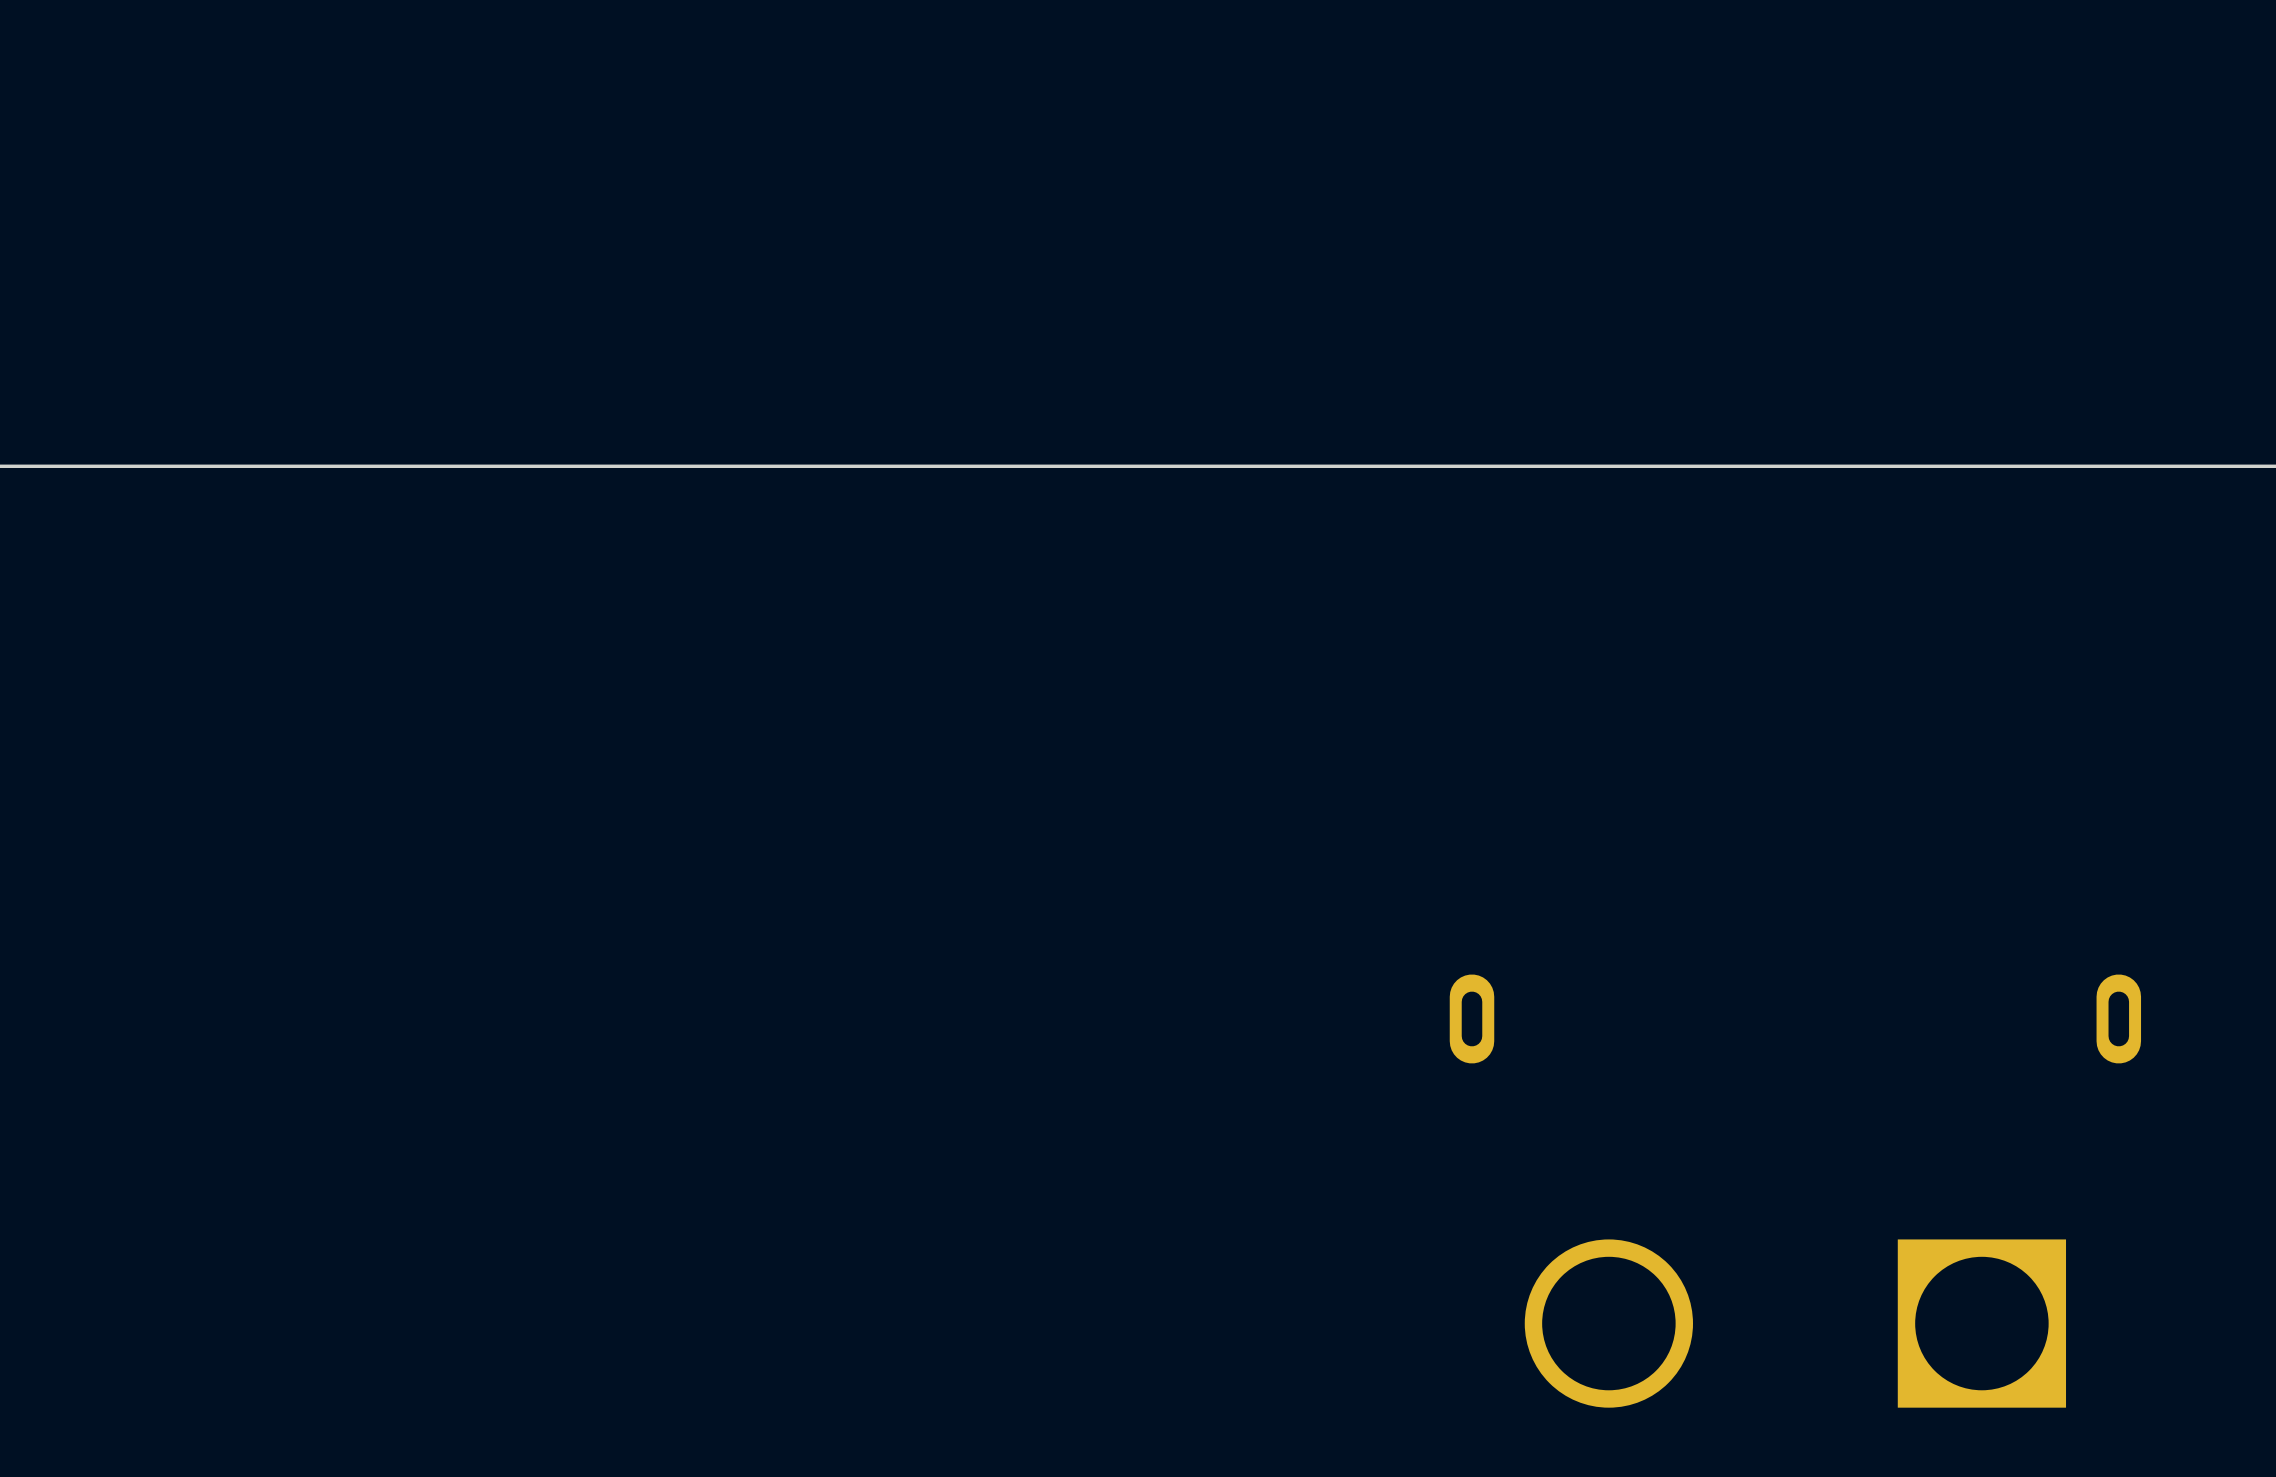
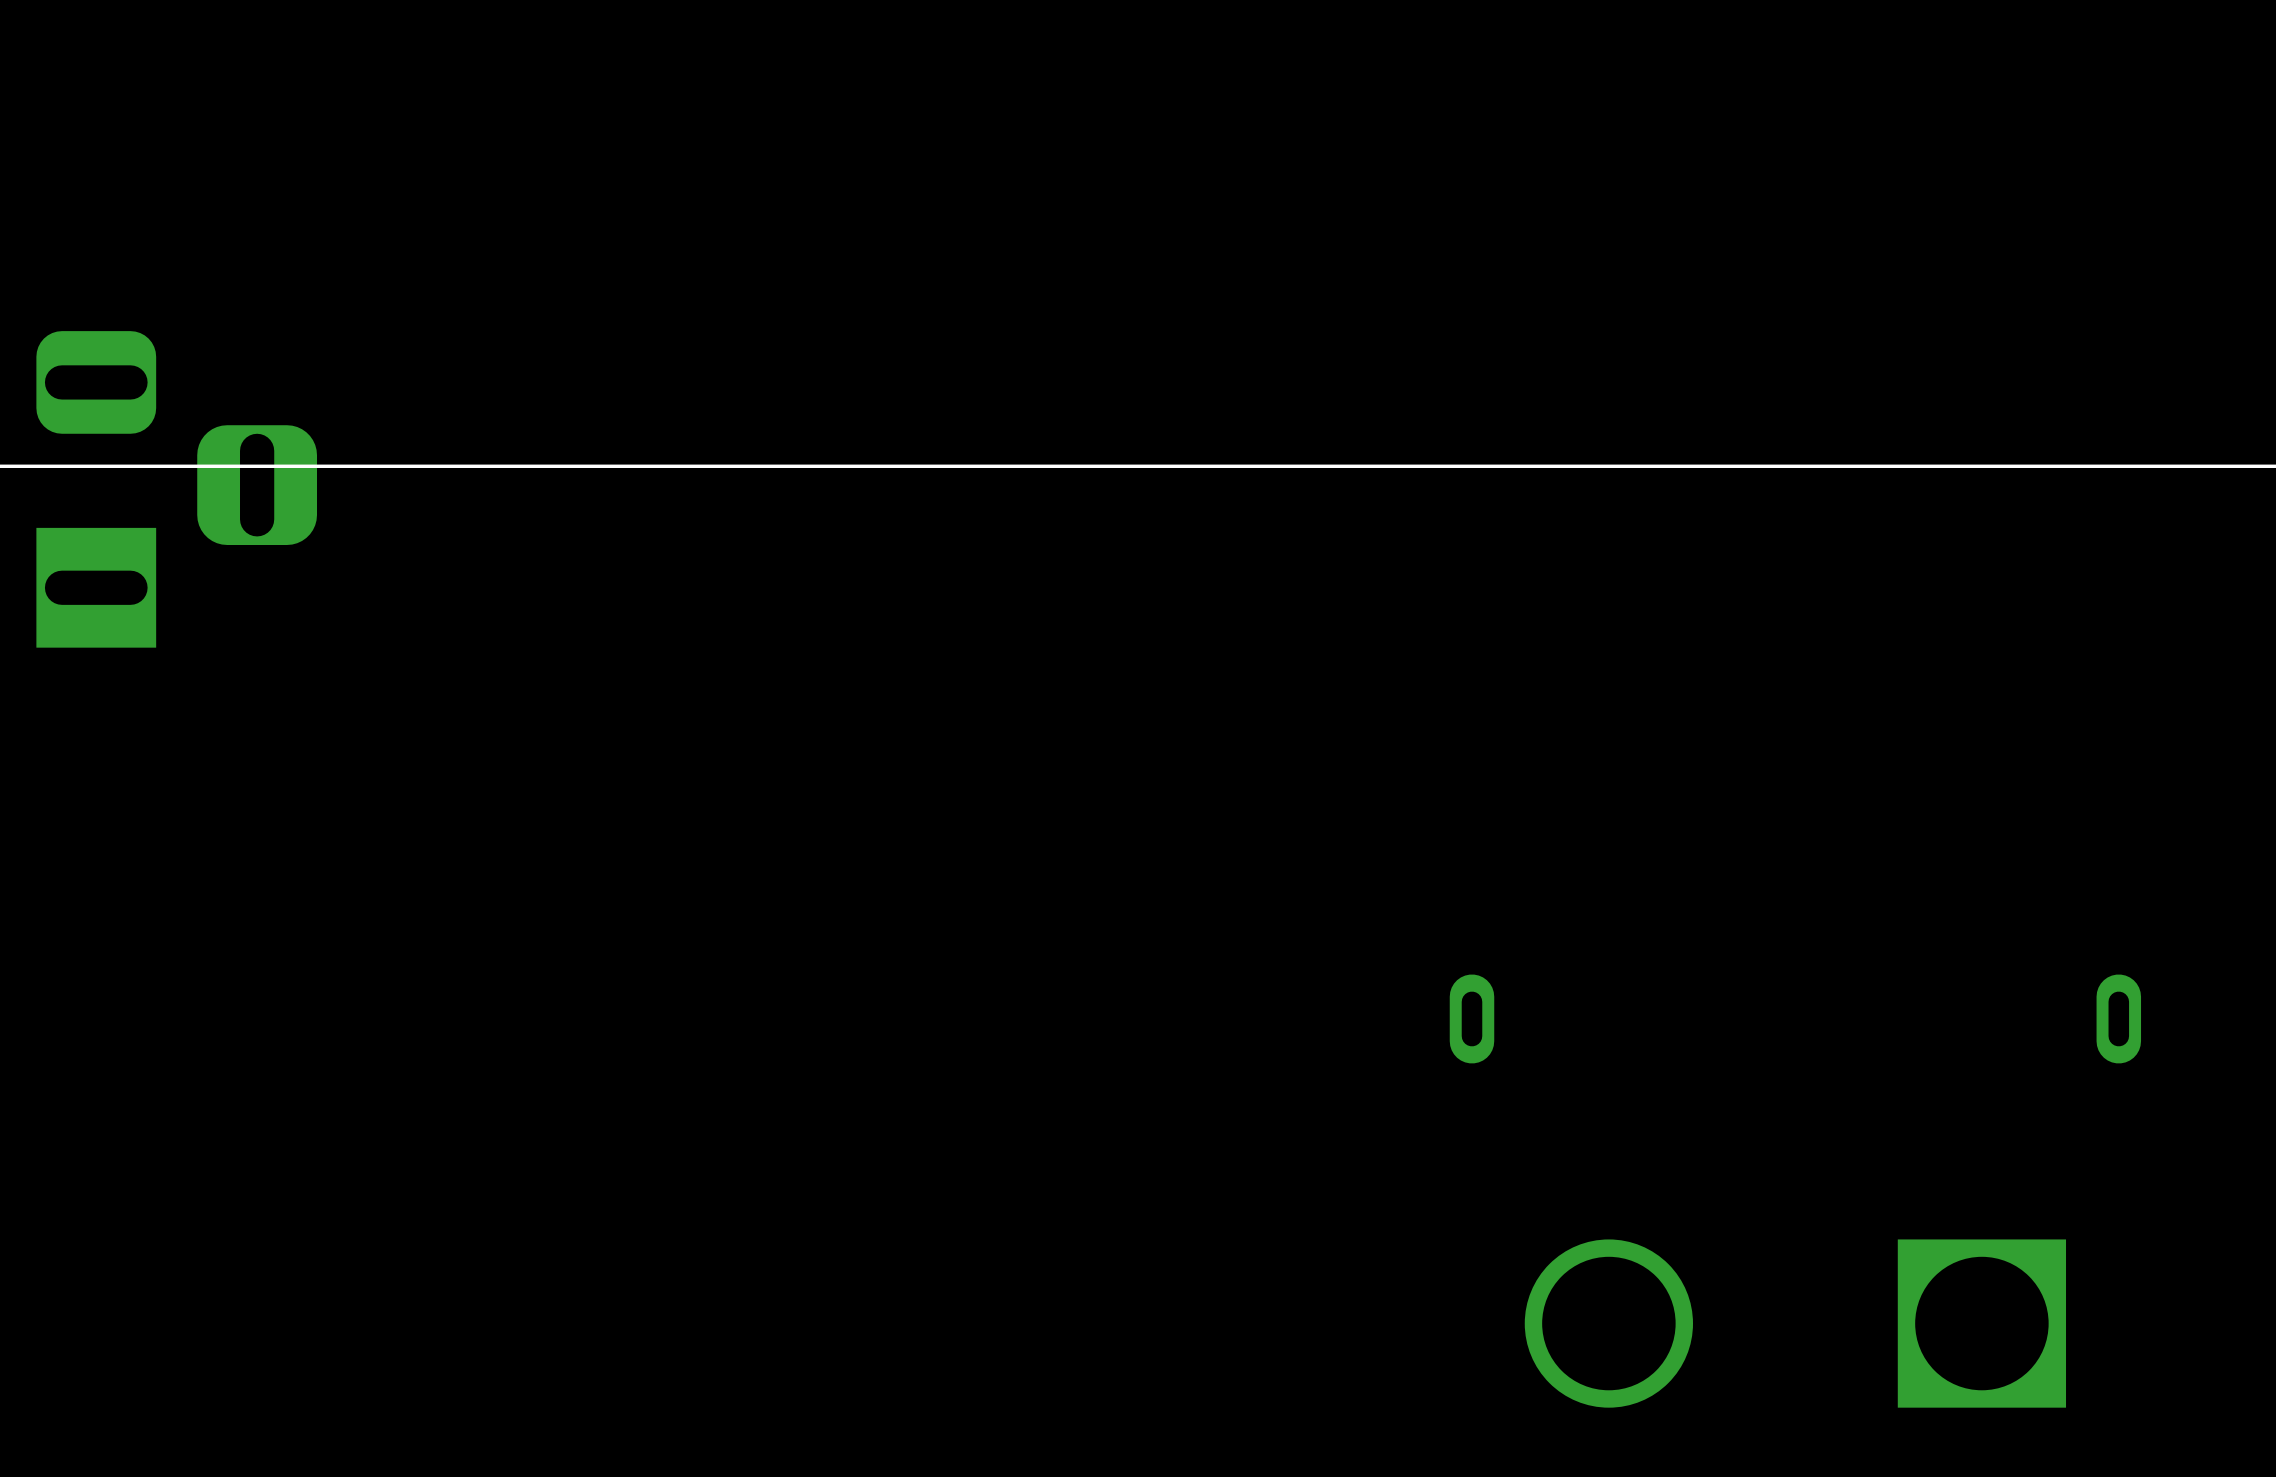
part: none -> (176, 489)

